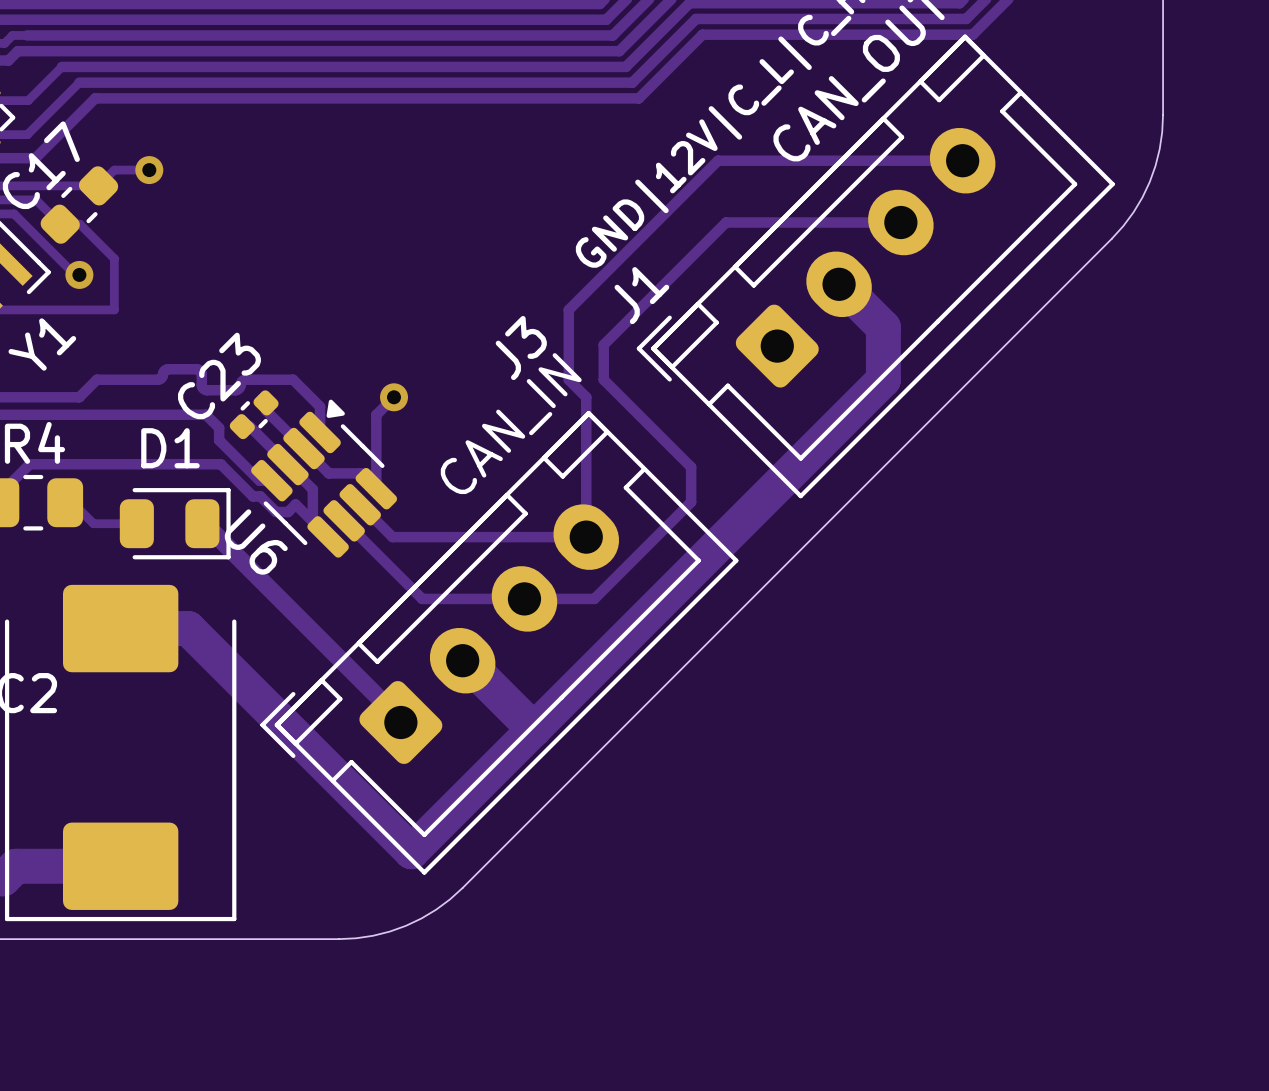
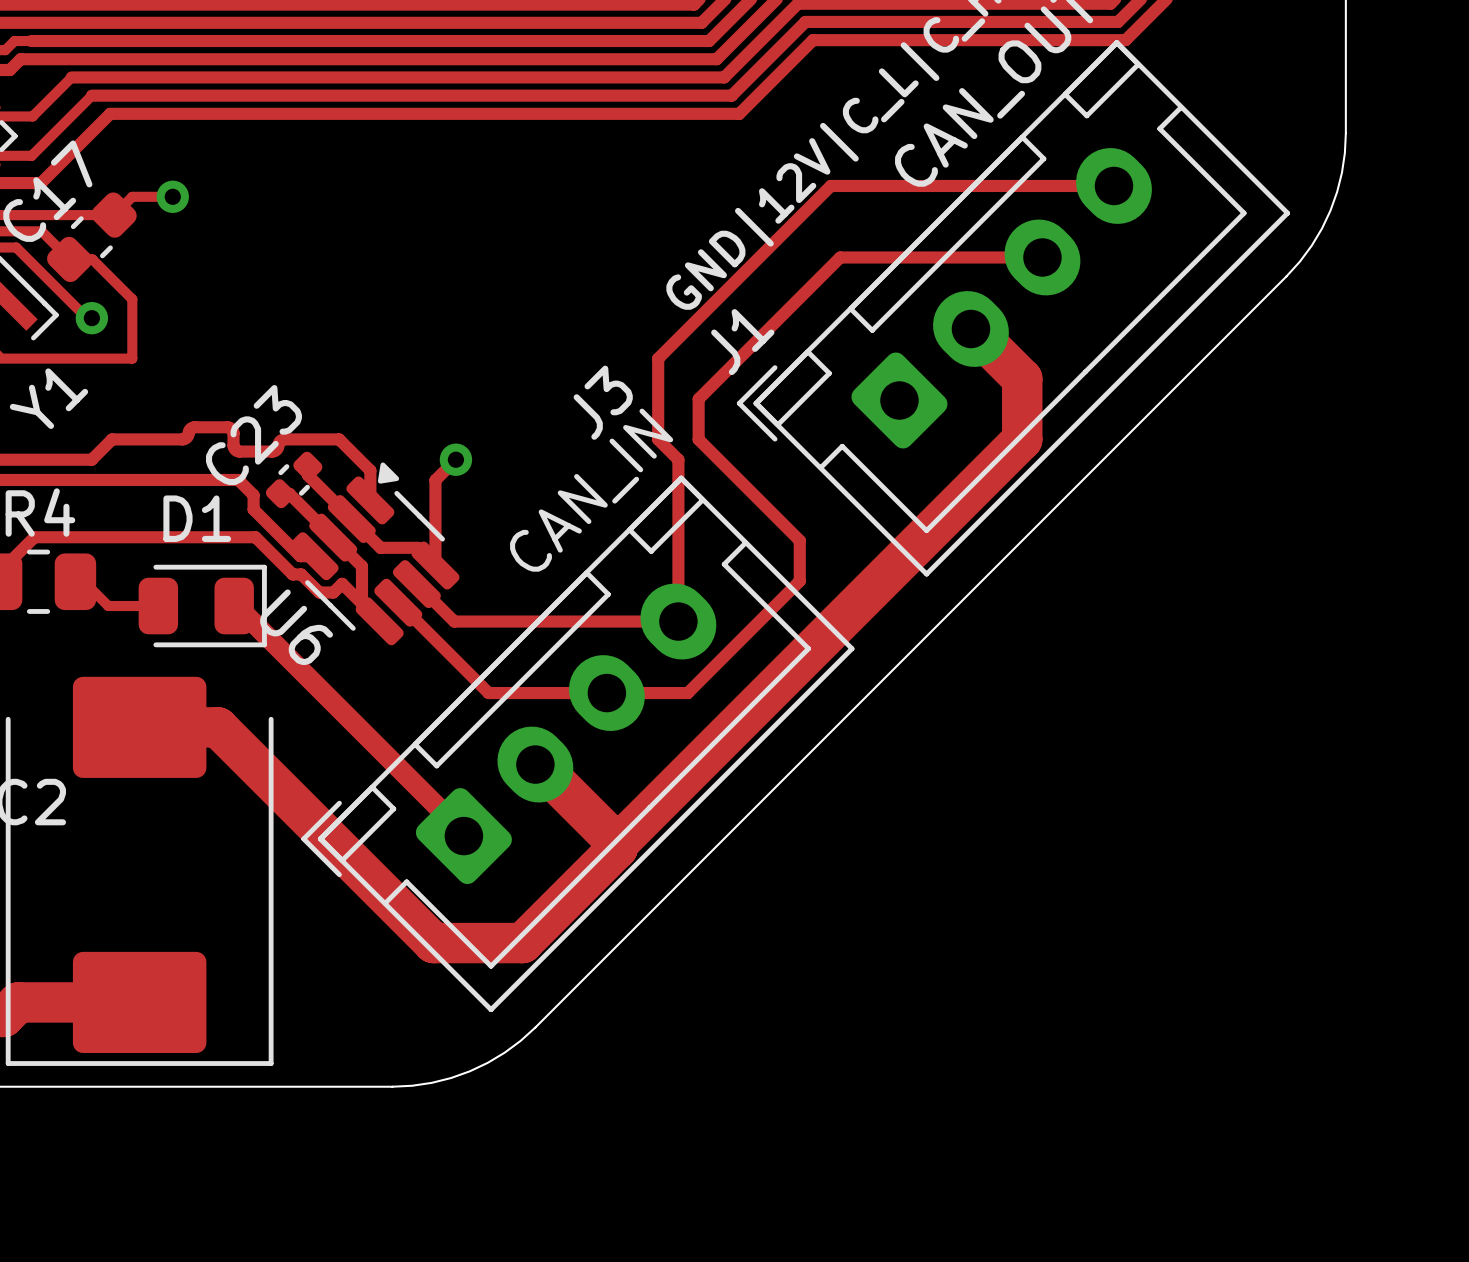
track: (533, 729) (411, 851) (374, 814) -> (617, 844) (617, 847) (522, 943) (433, 943)

